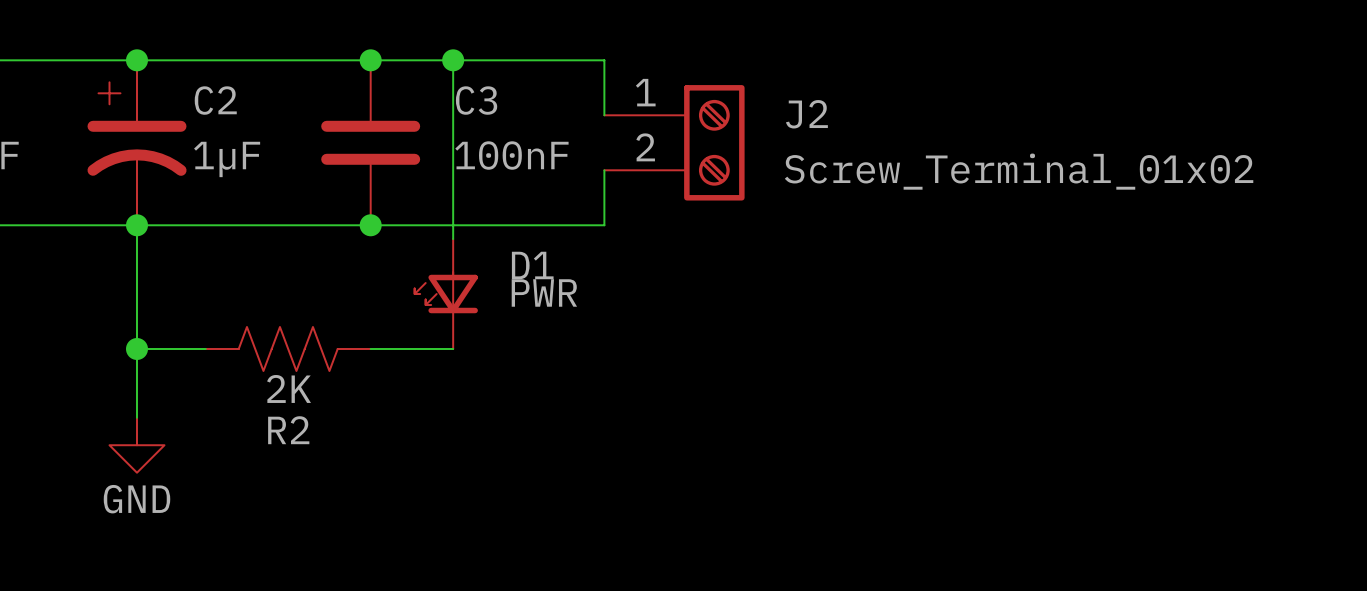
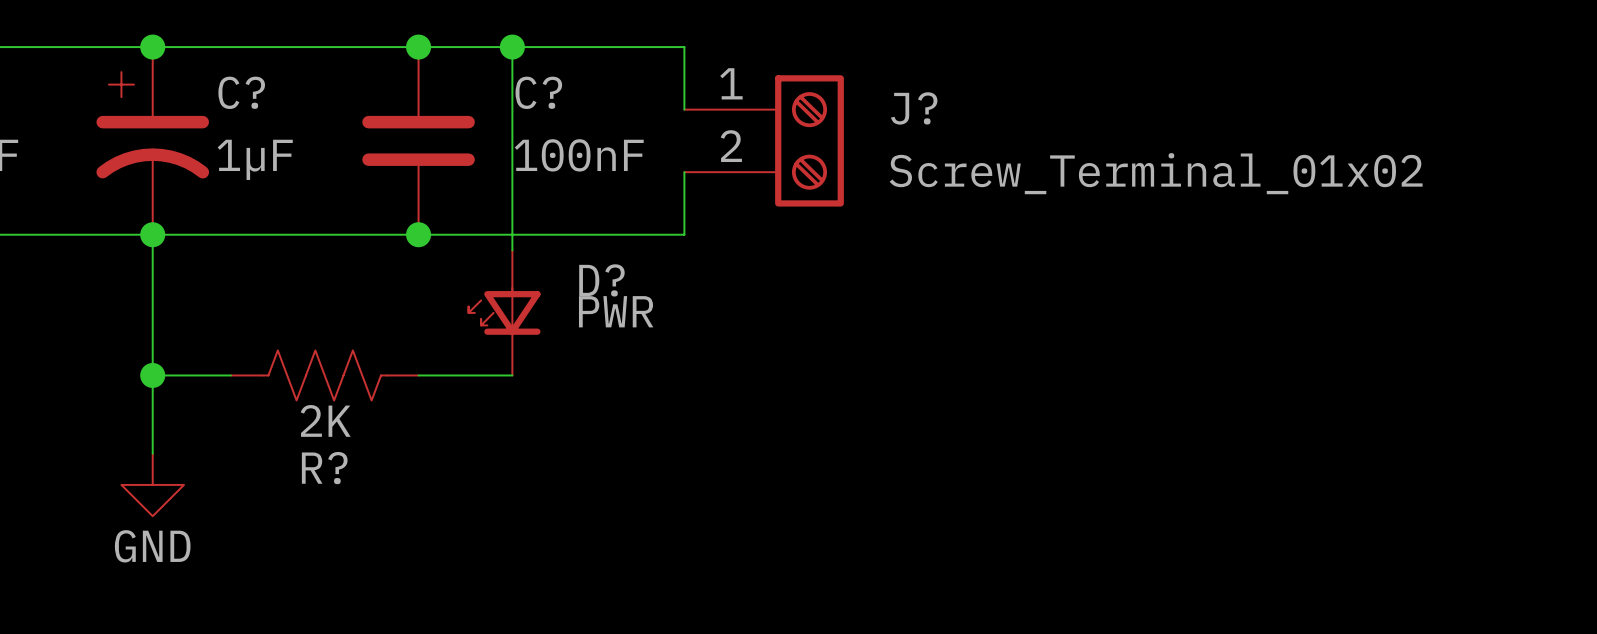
C2 name: C2 (215, 100) -> C? (241, 92)
C3 name: C3 (476, 100) -> C? (538, 92)
J2 name: J2 (806, 114) -> J? (914, 108)
D1 name: D1 (532, 265) -> D? (601, 280)
R2 name: R2 (288, 430) -> R? (324, 468)

